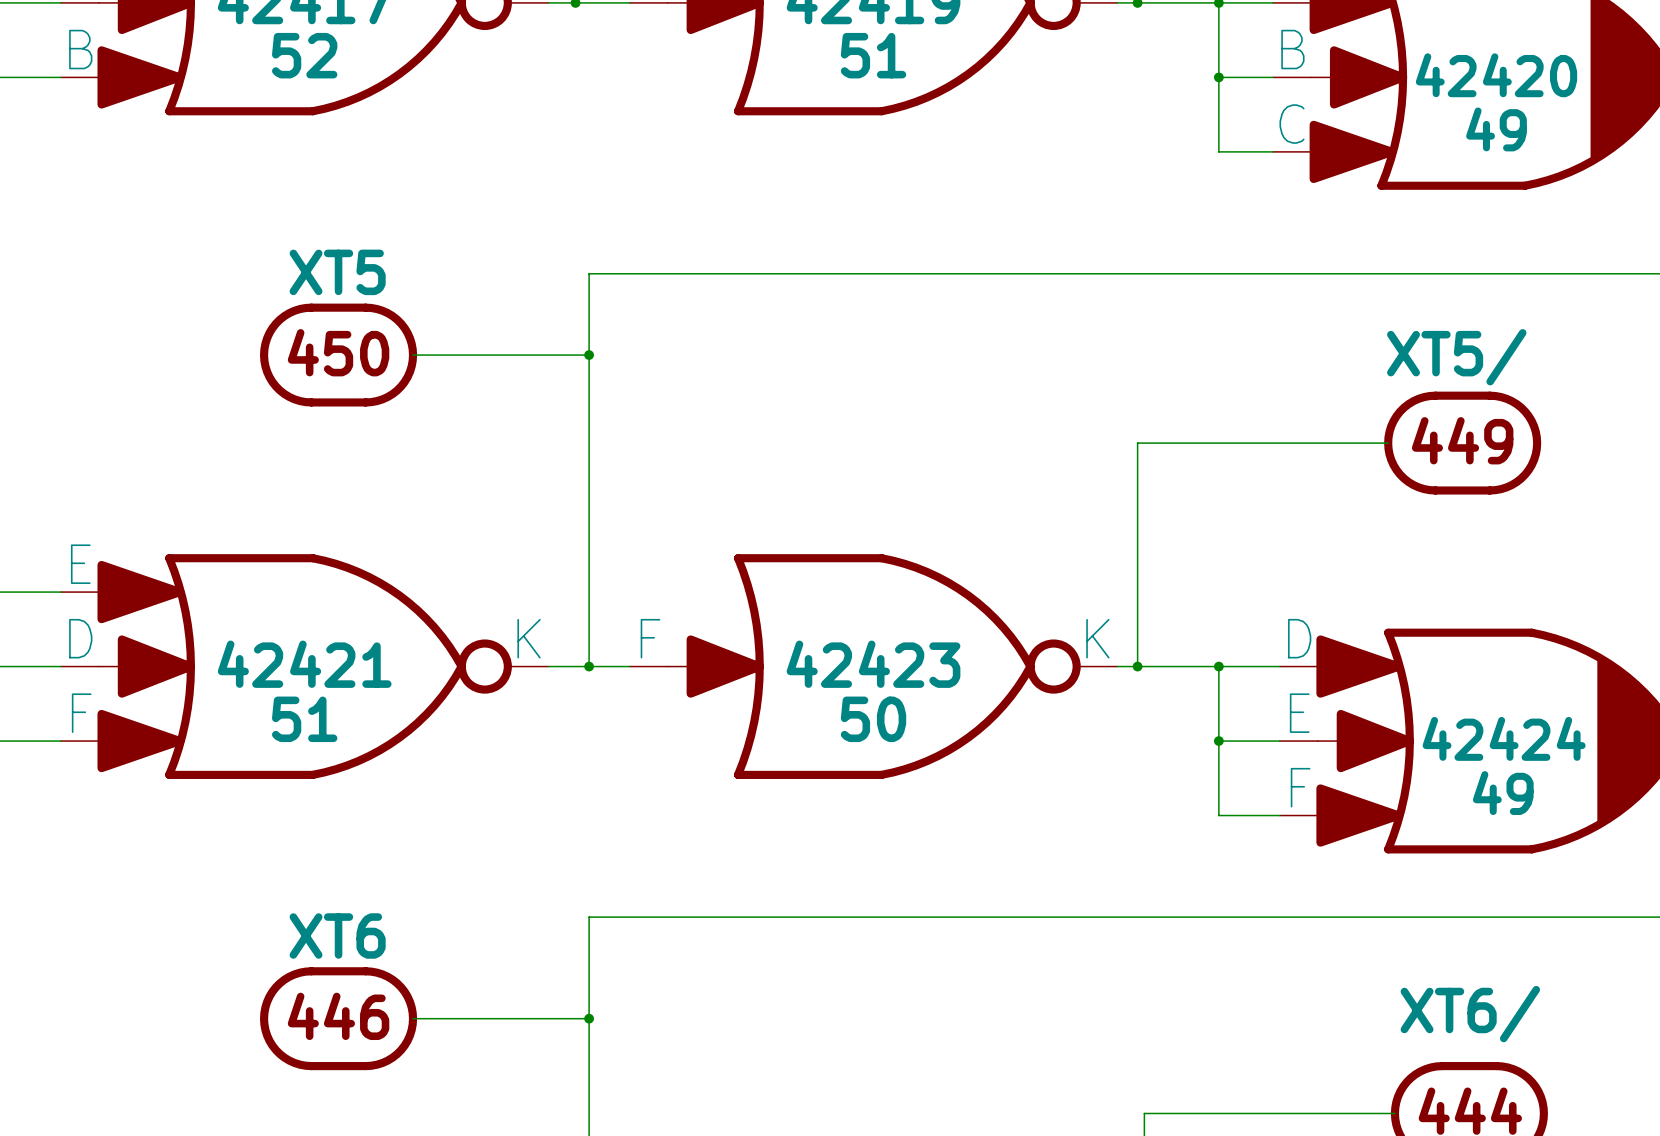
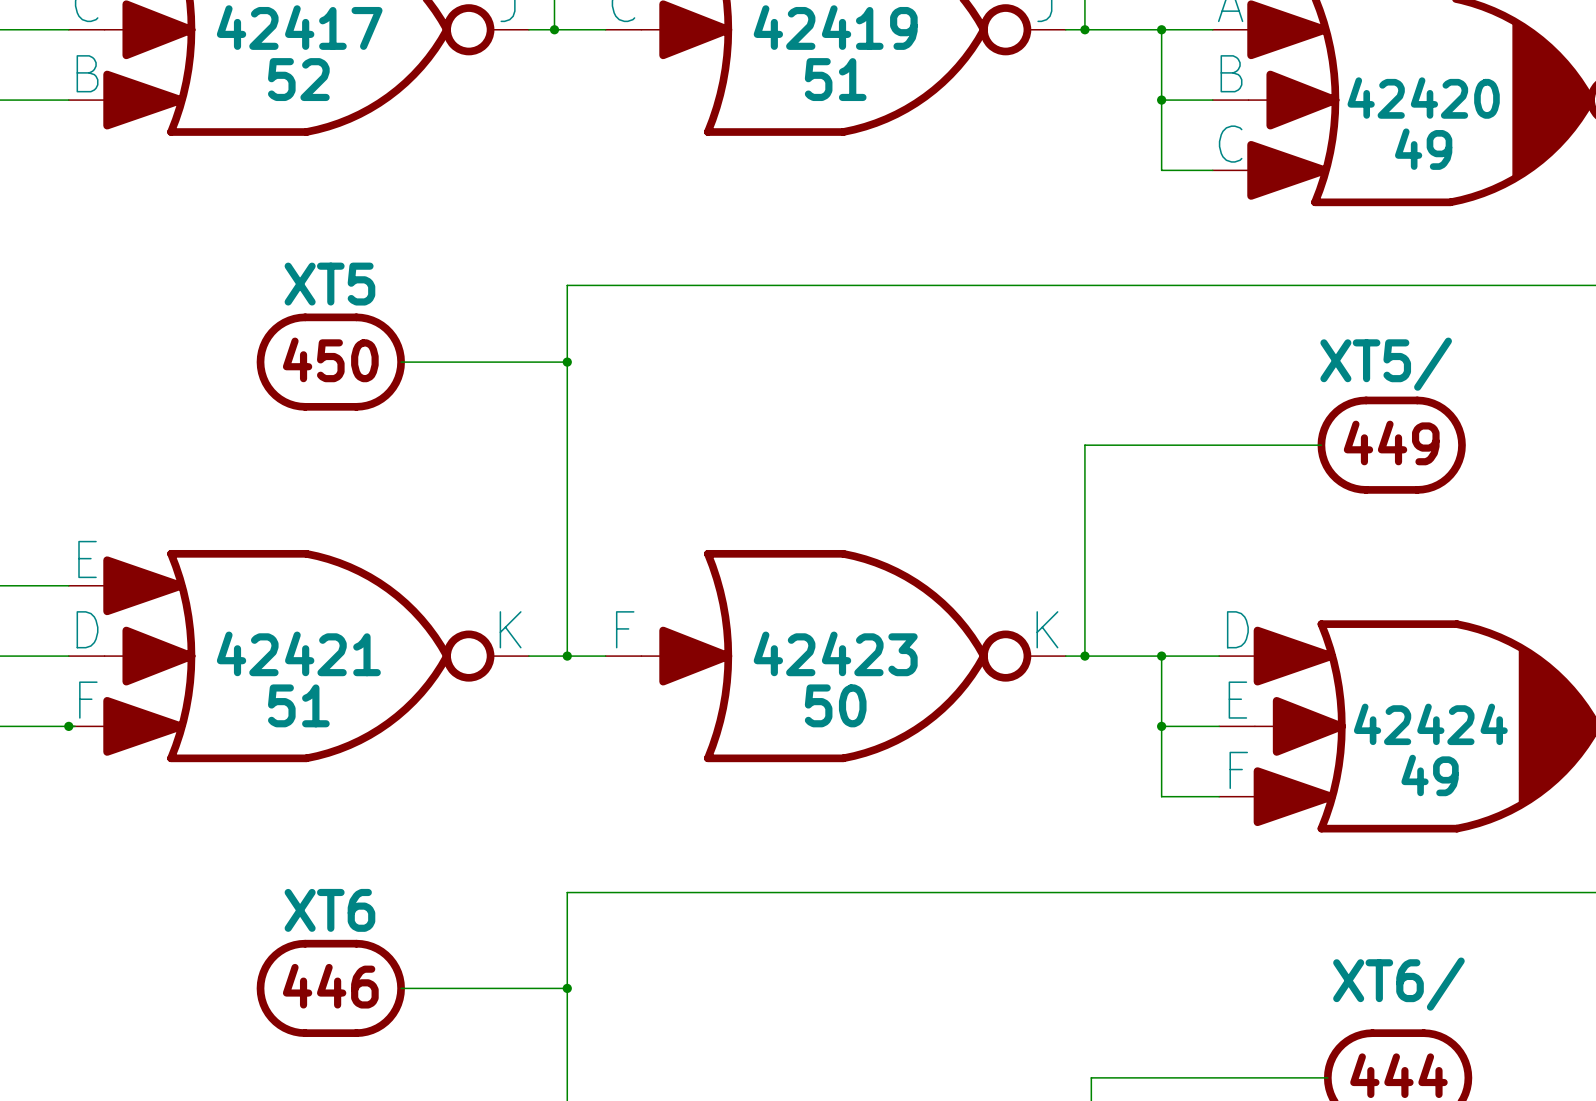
junction: none -> (68, 726)

